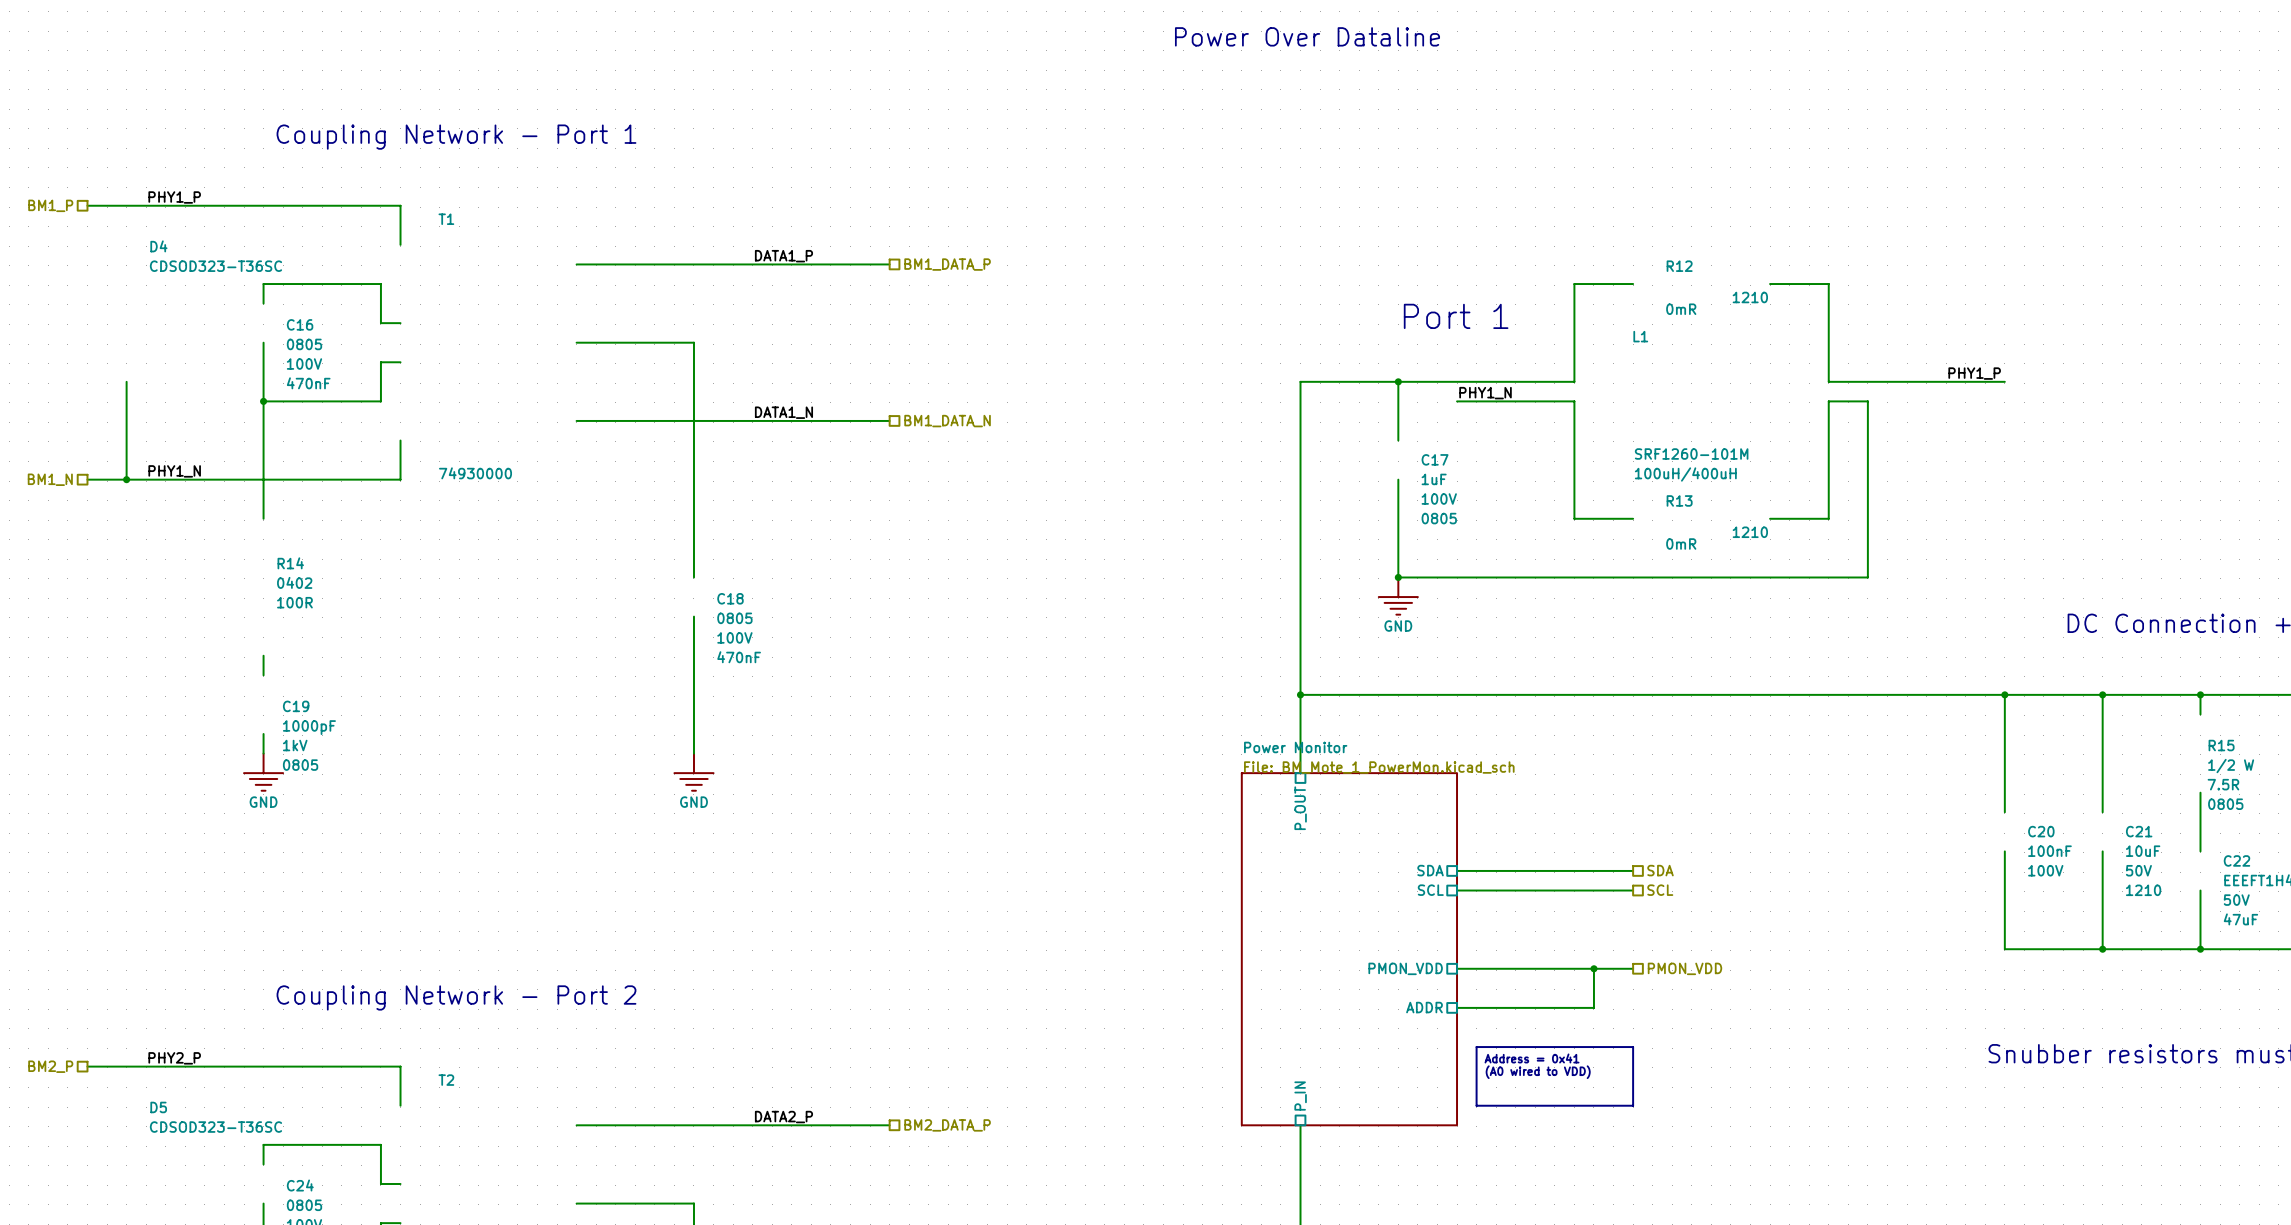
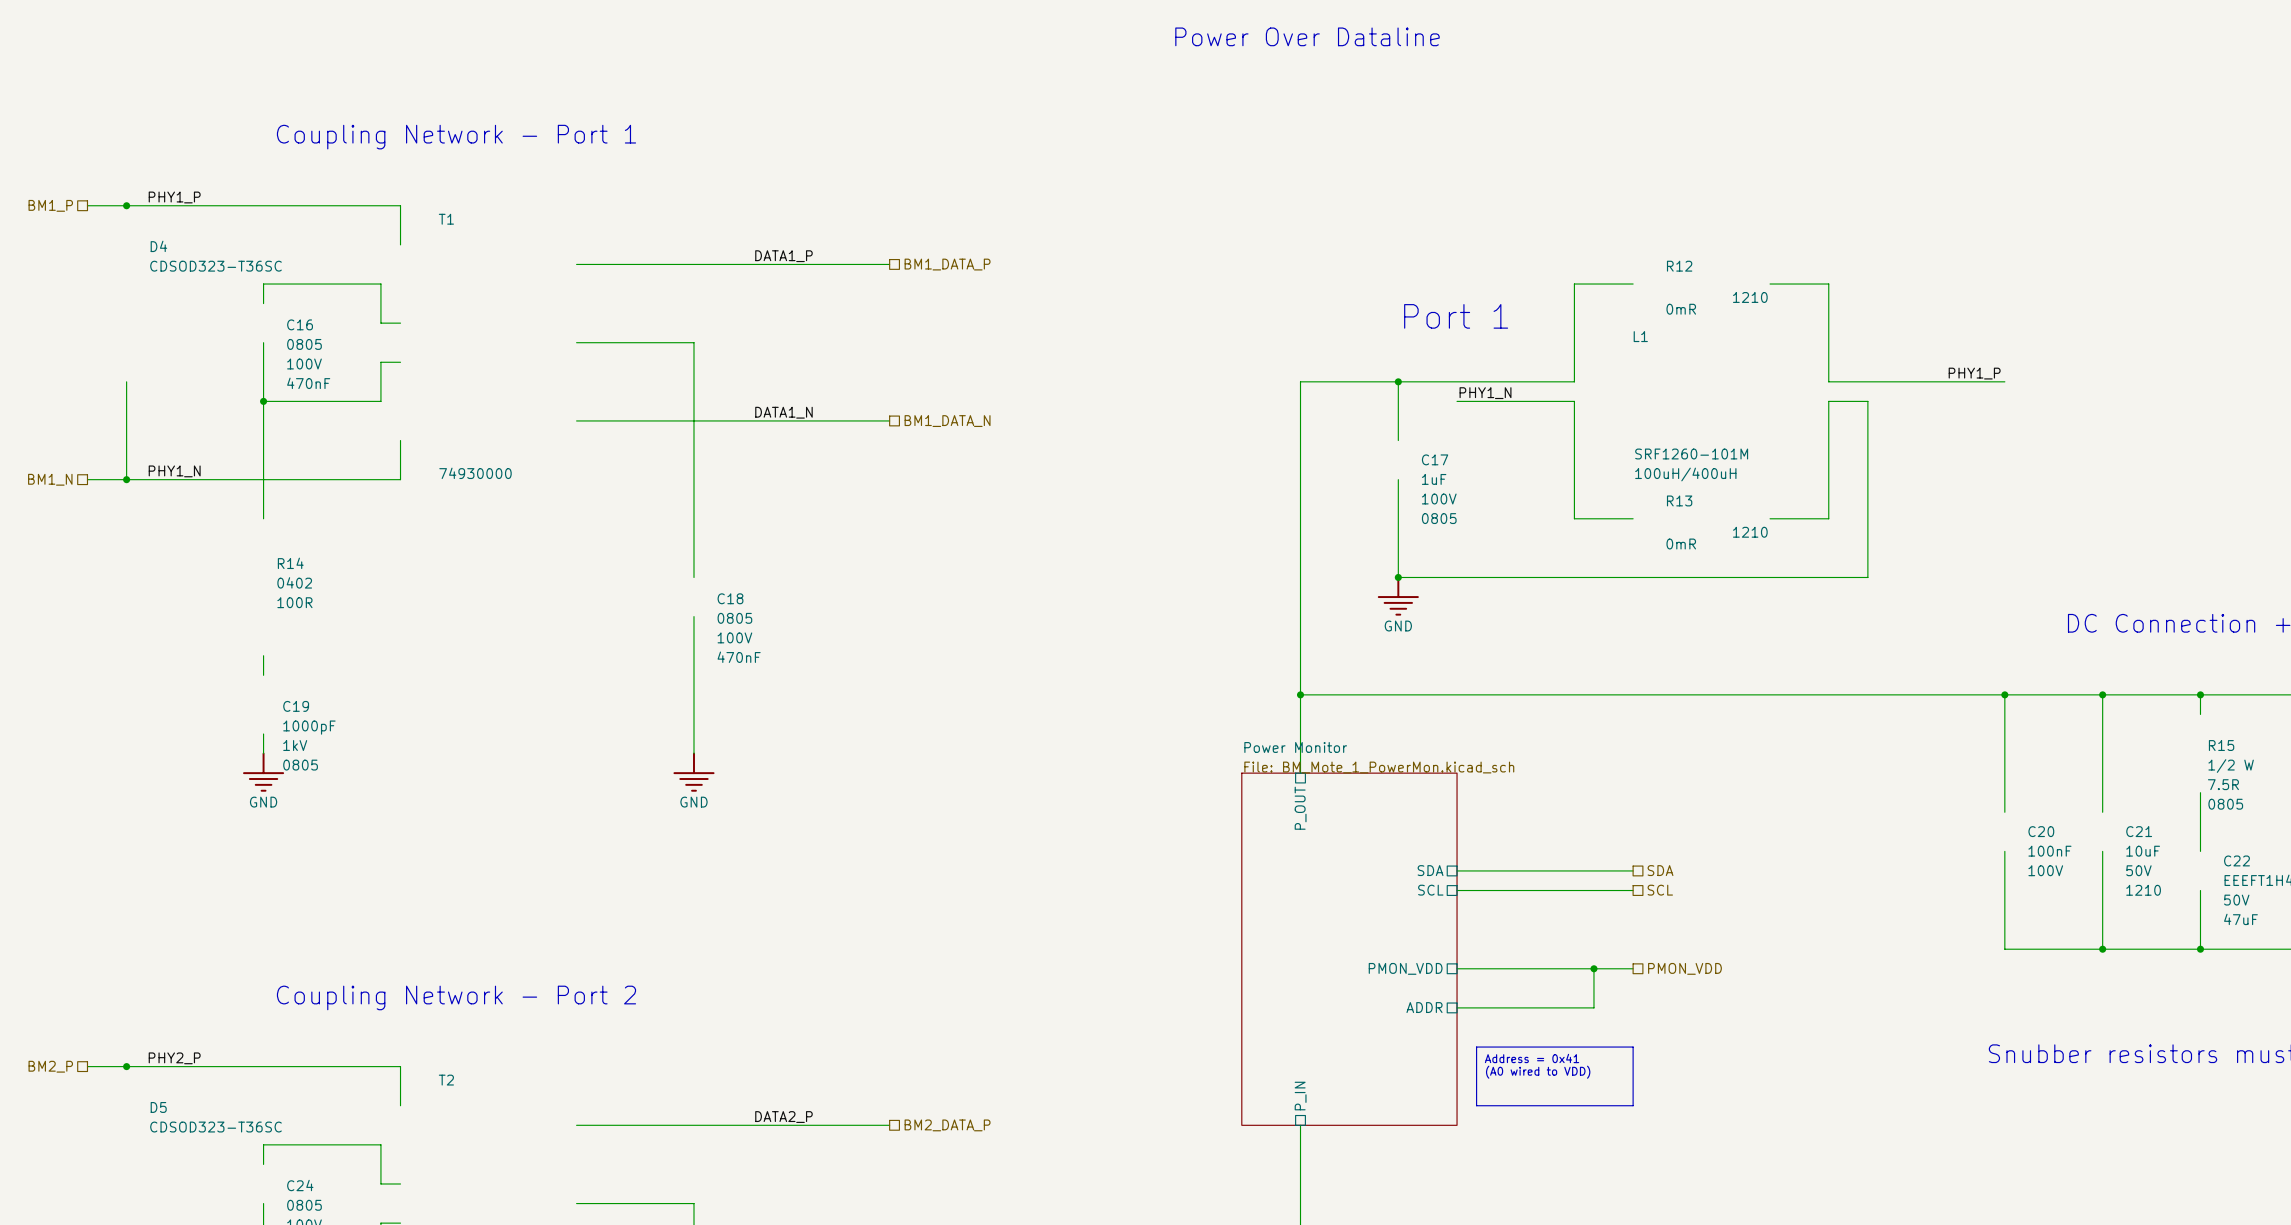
junction: none -> (126, 205)
junction: none -> (126, 1066)

